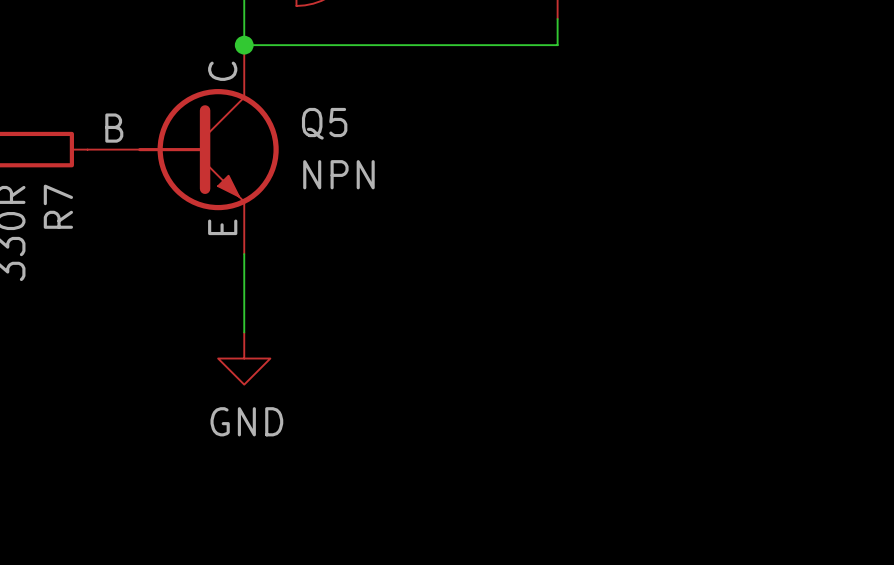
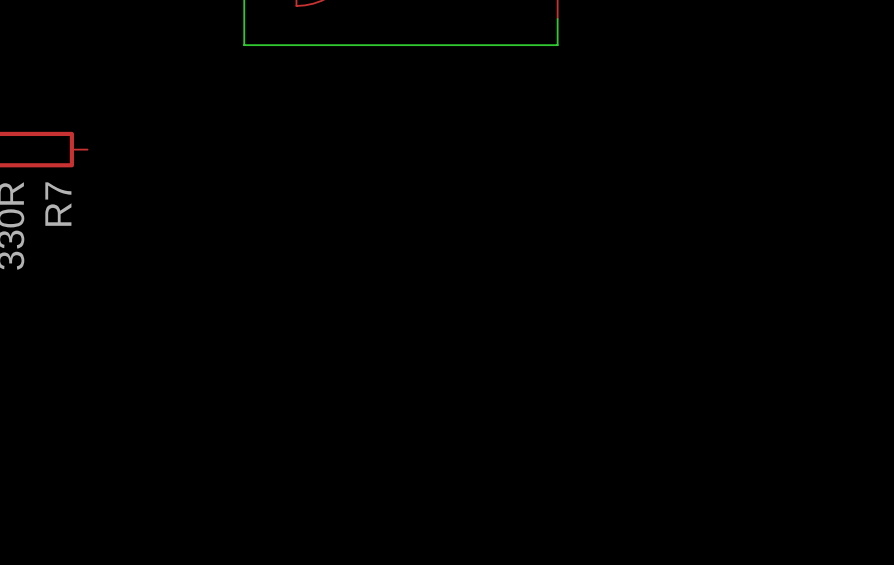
junction: (244, 45) -> none
Q5: NPN (183, 149) -> none
wire: (244, 254) (244, 332) -> none
power symbol: GND (244, 358) -> none

